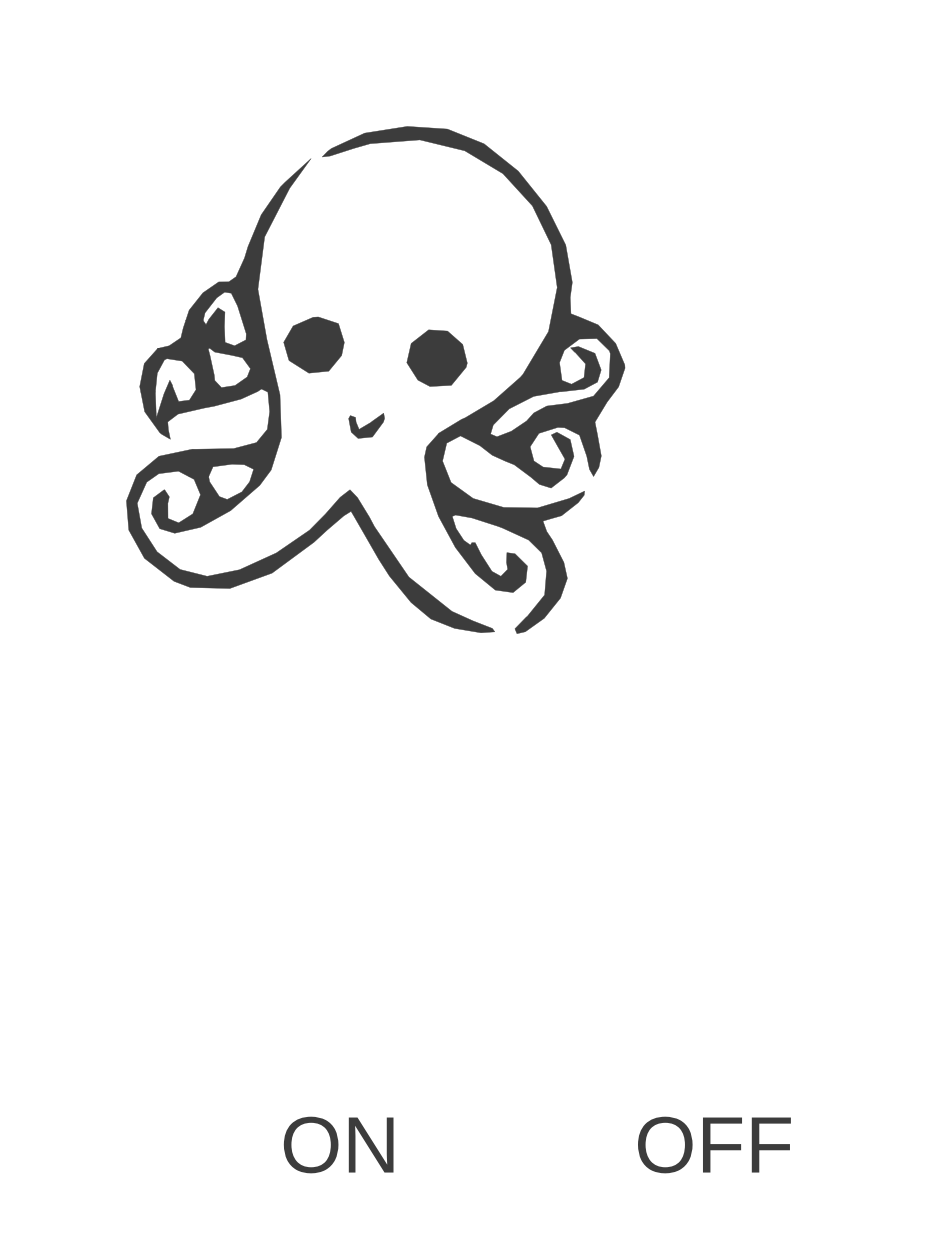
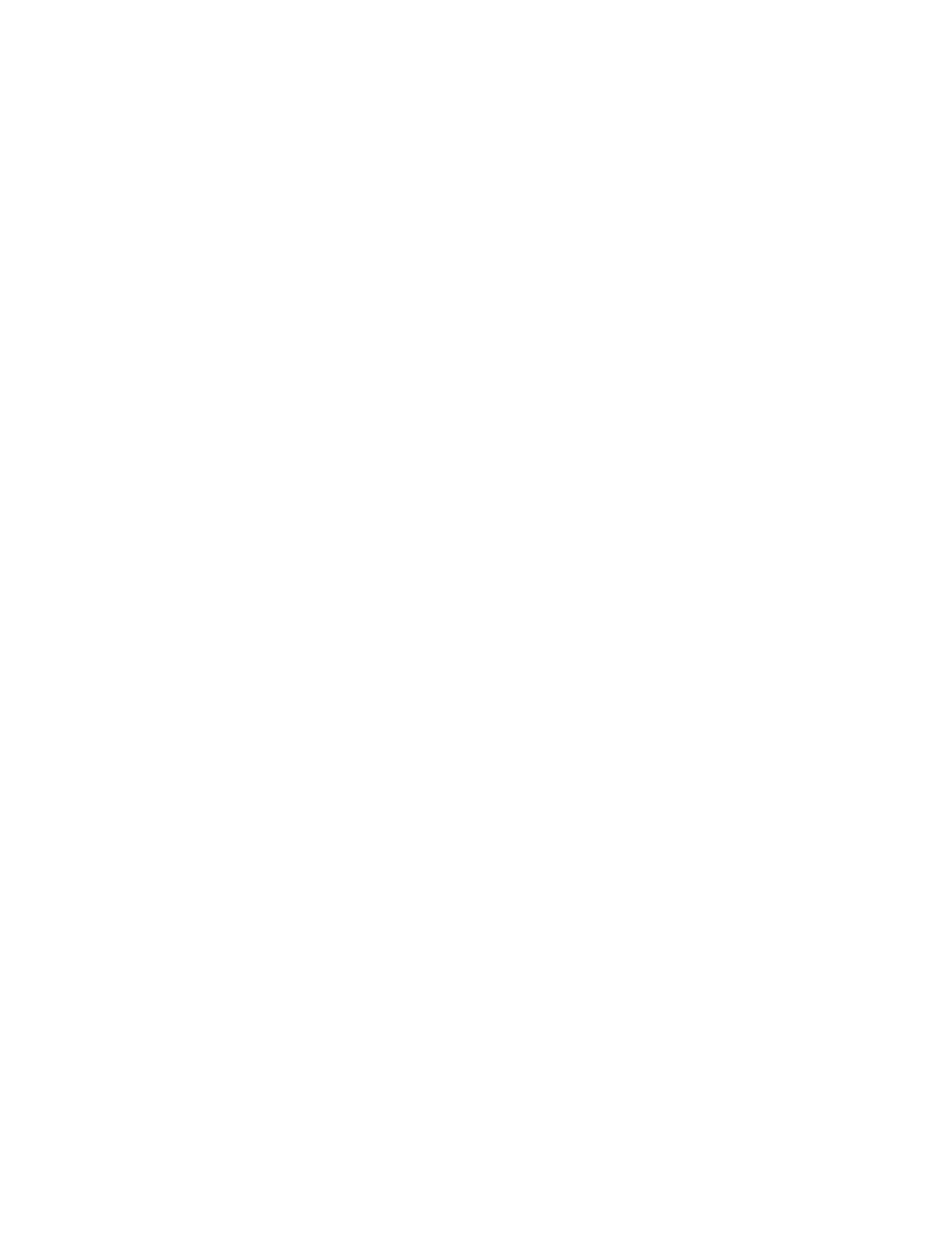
drawing: [126, 126, 626, 634] -> none
text: ON (338, 1145) -> none
text: OFF (714, 1145) -> none

